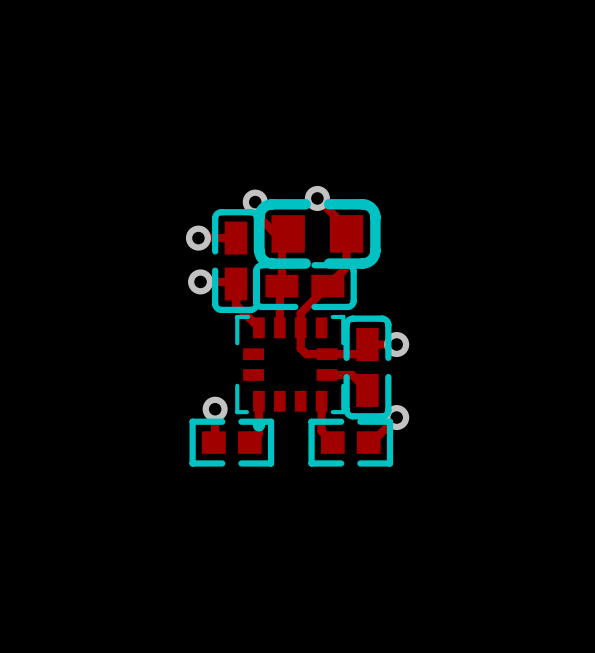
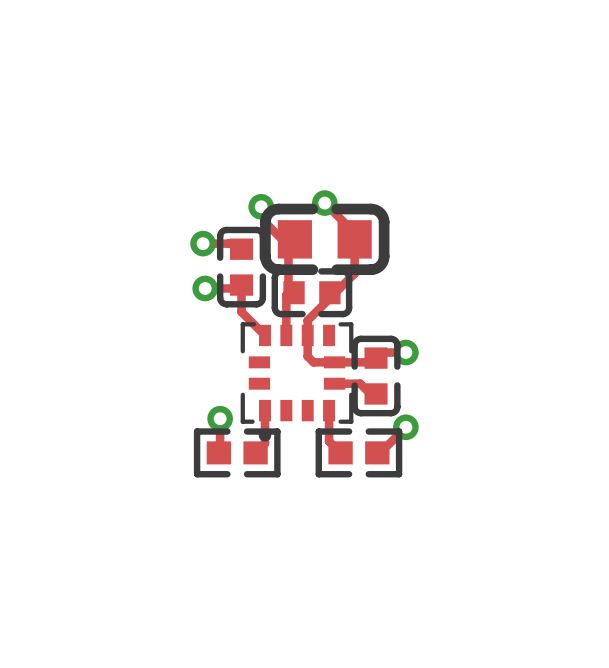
part footprint: [212, 209, 261, 314] -> [216, 226, 267, 308]
part footprint: [252, 262, 357, 311] -> [271, 268, 353, 318]
part footprint: [343, 315, 392, 420] -> [351, 335, 401, 417]

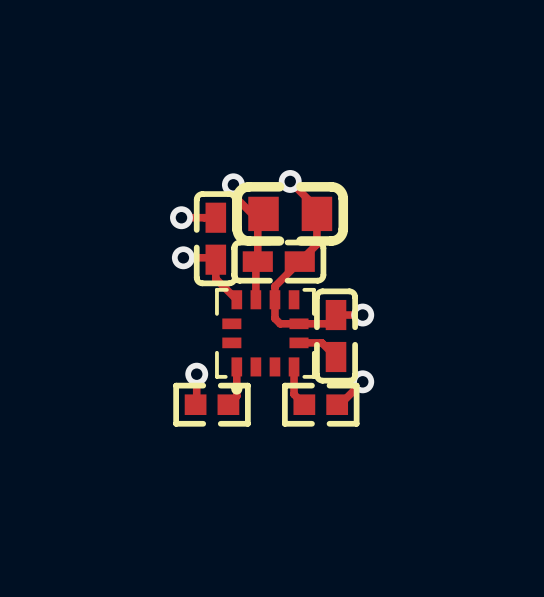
part footprint: [216, 226, 267, 308] -> [193, 191, 238, 287]
part footprint: [271, 268, 353, 318] -> [231, 239, 327, 284]
part footprint: [351, 335, 401, 417] -> [314, 288, 358, 384]

